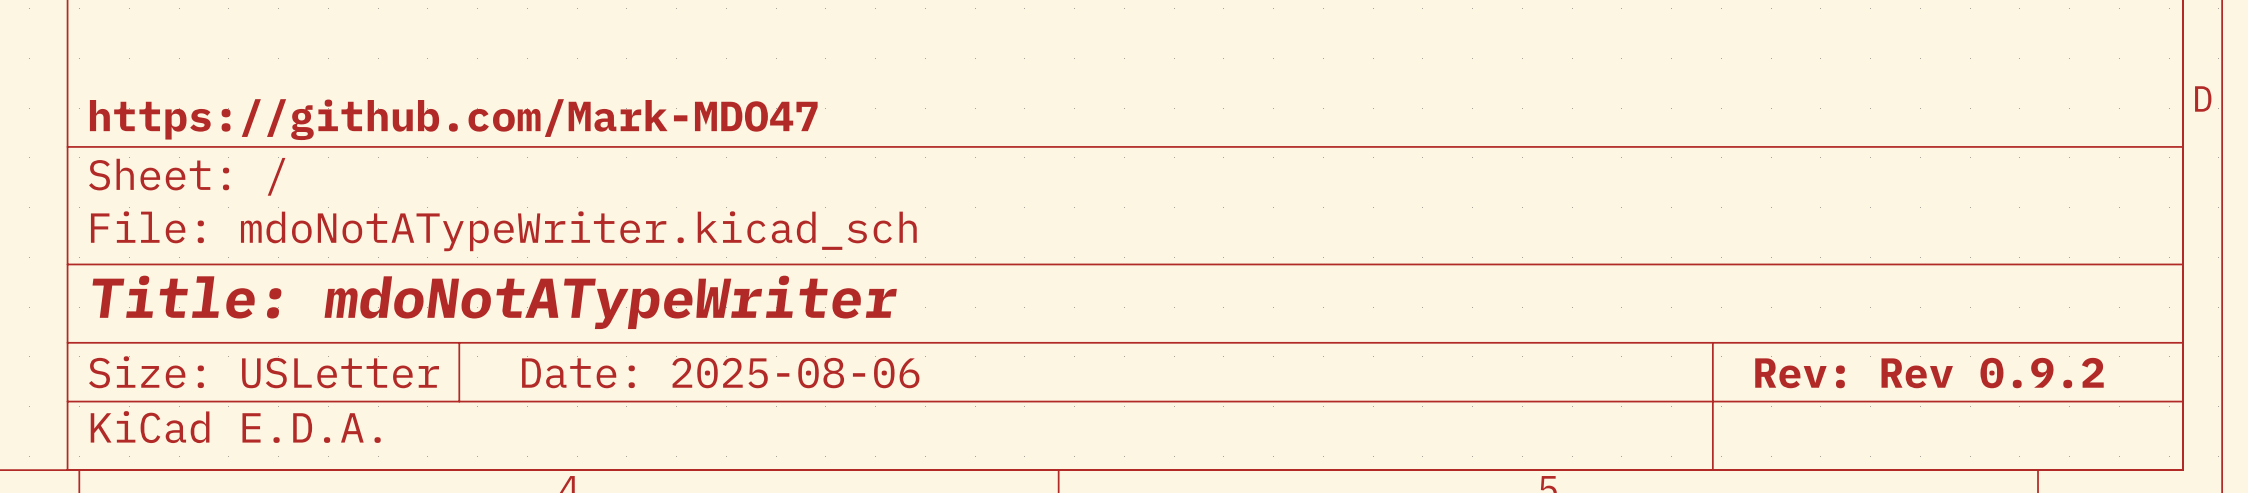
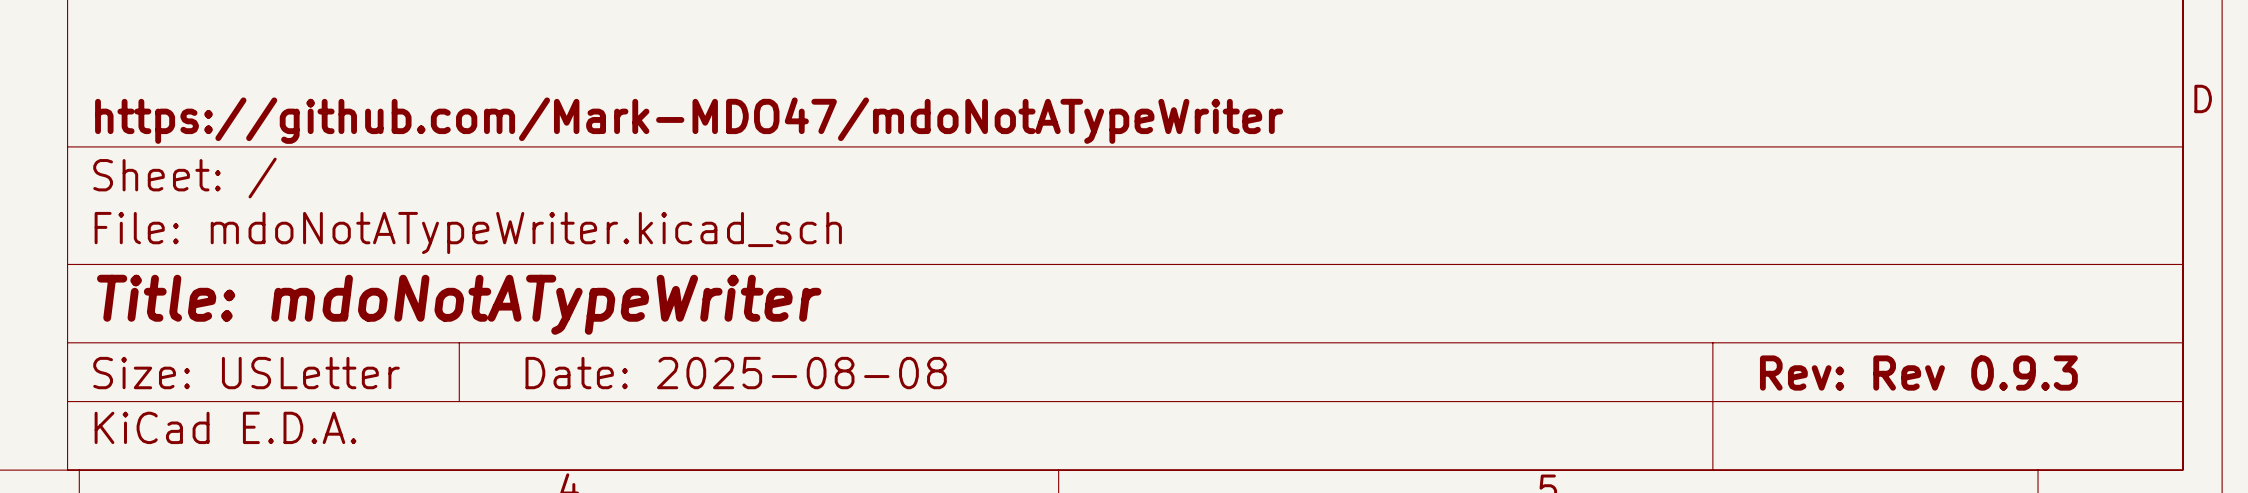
title block: https://github.com/Mark-MDO47 (453, 119) -> https://github.com/Mark-MDO47/mdoNotATypeWriter (689, 120)
title block: Date: 2025-08-06 (720, 373) -> Date: 2025-08-08 (736, 373)
title block: Rev: Rev 0.9.2 (1929, 373) -> Rev: Rev 0.9.3 (1918, 373)

